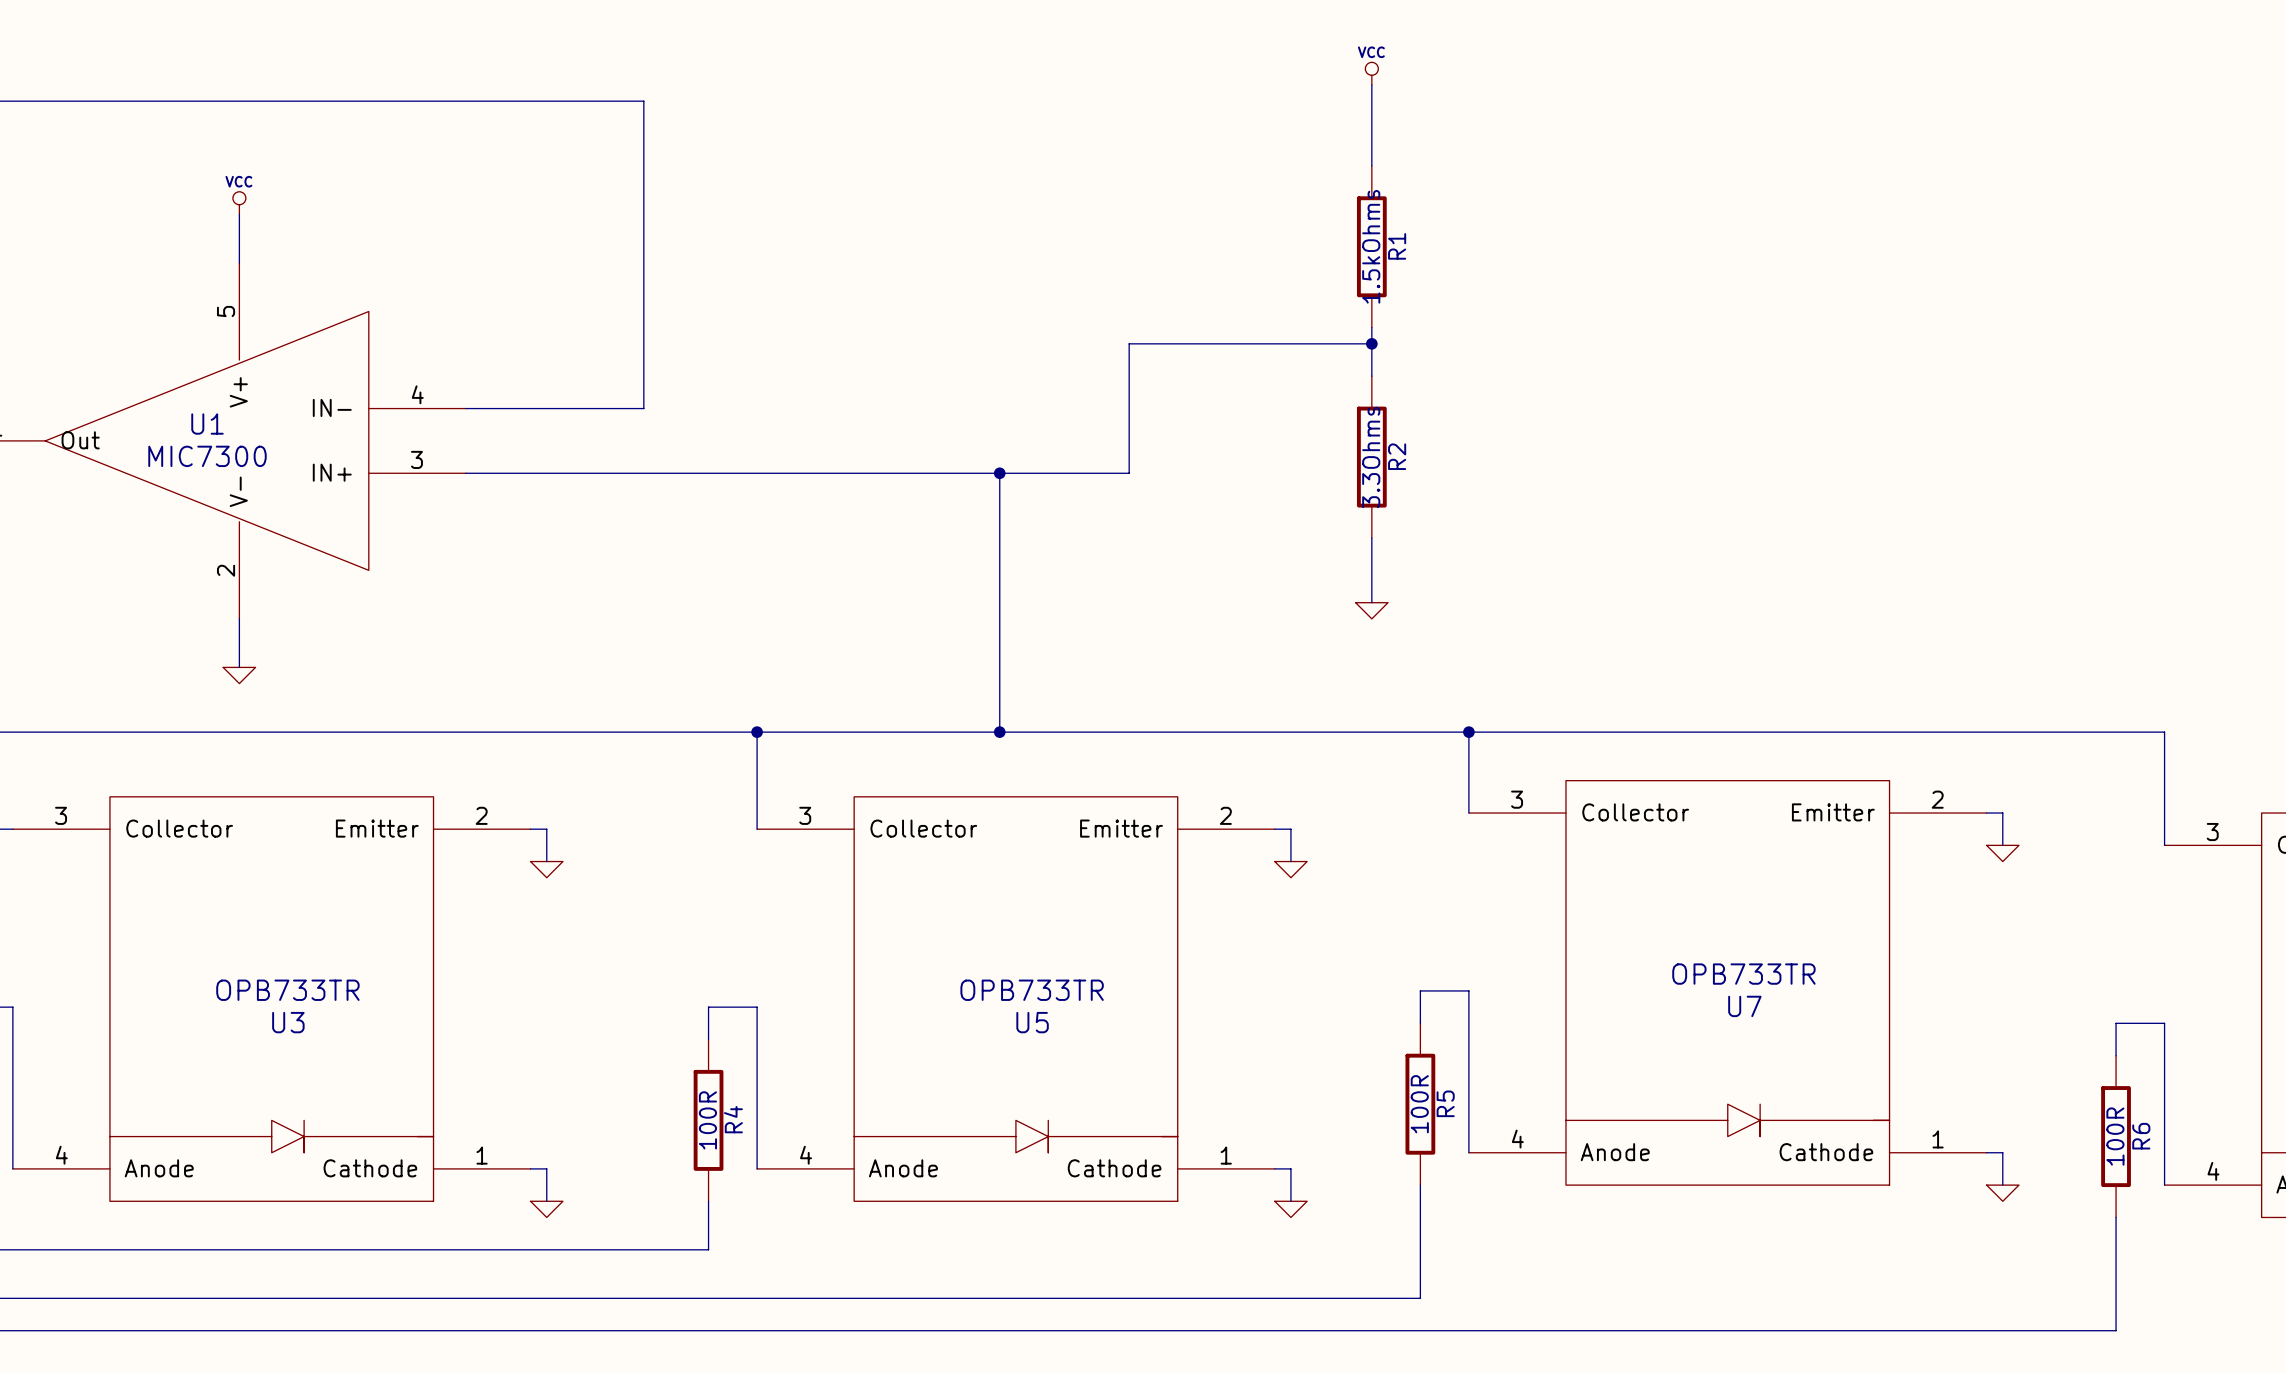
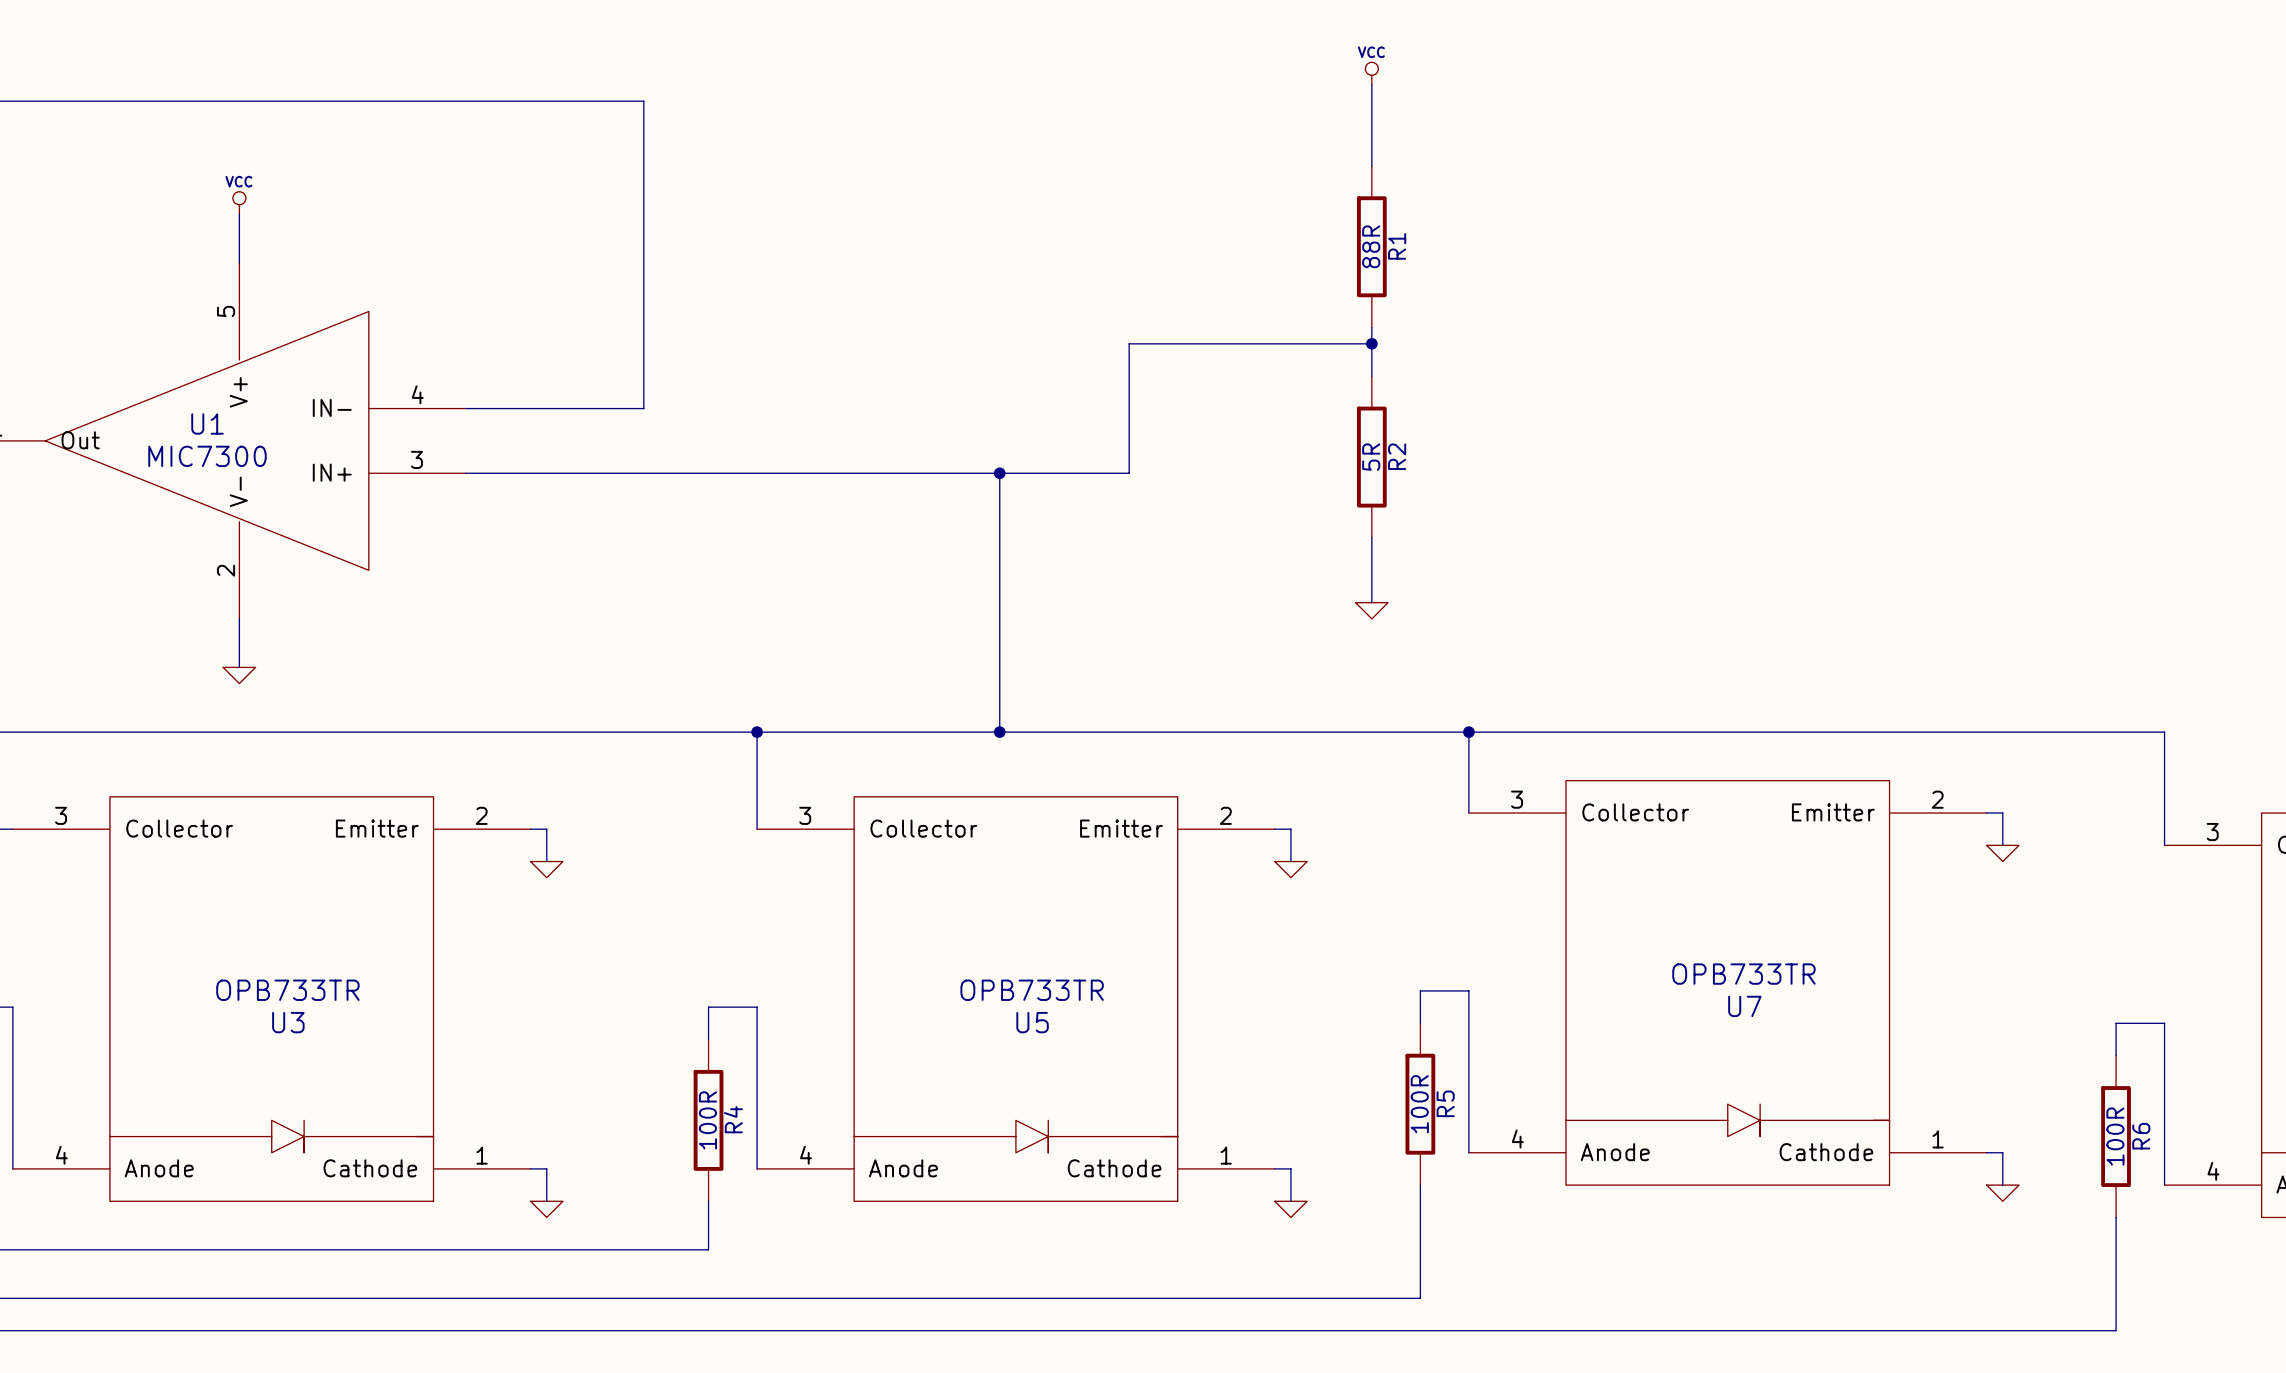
R1 value: 1.5kOhms (1371, 246) -> 88R (1371, 246)
R2 value: 3.3Ohms (1371, 457) -> 5R (1371, 457)

